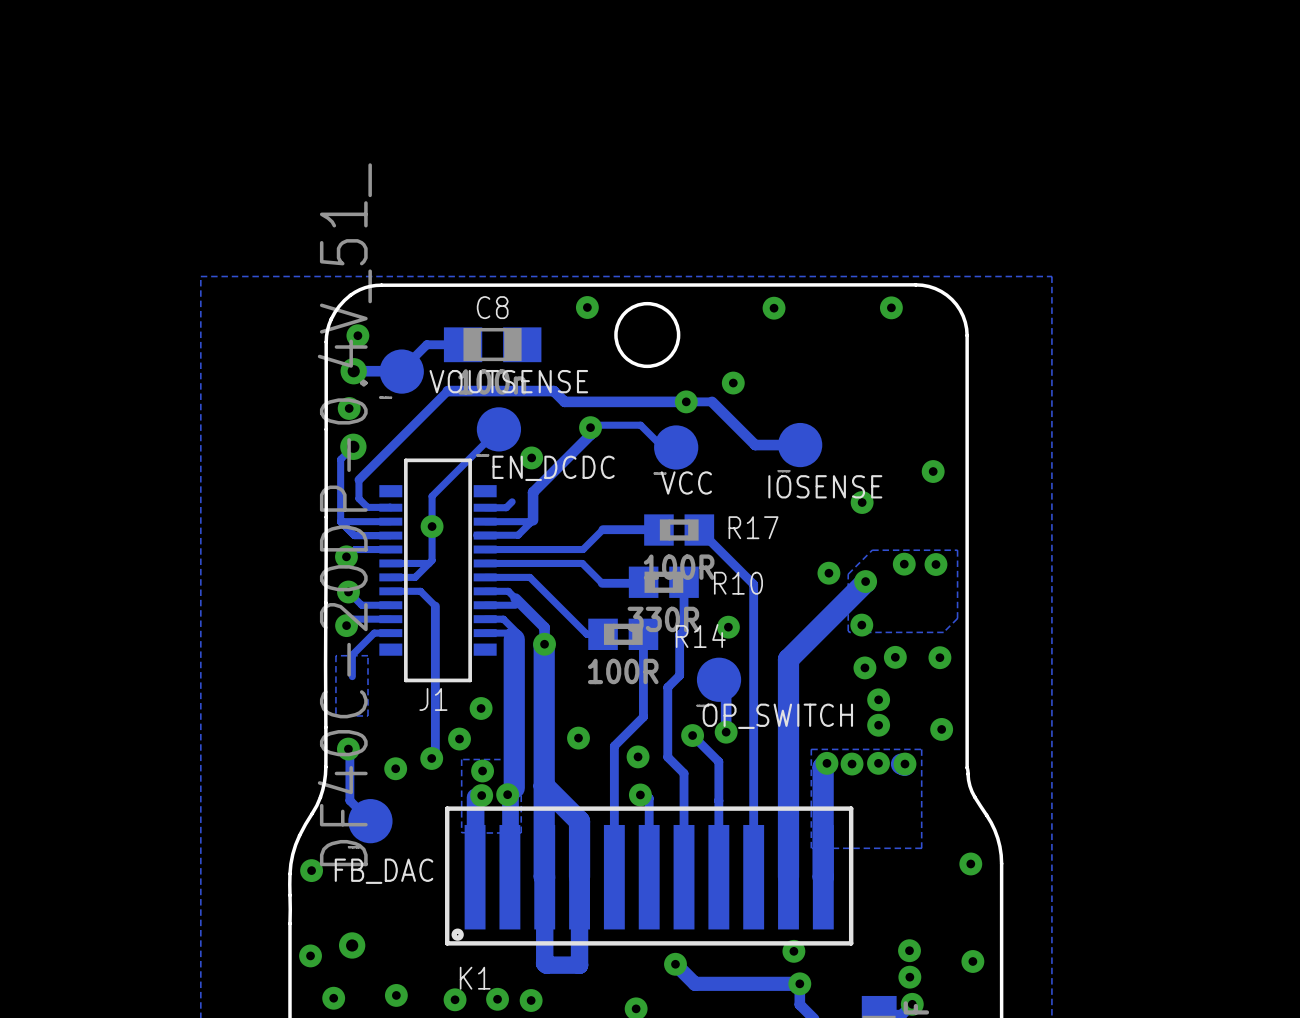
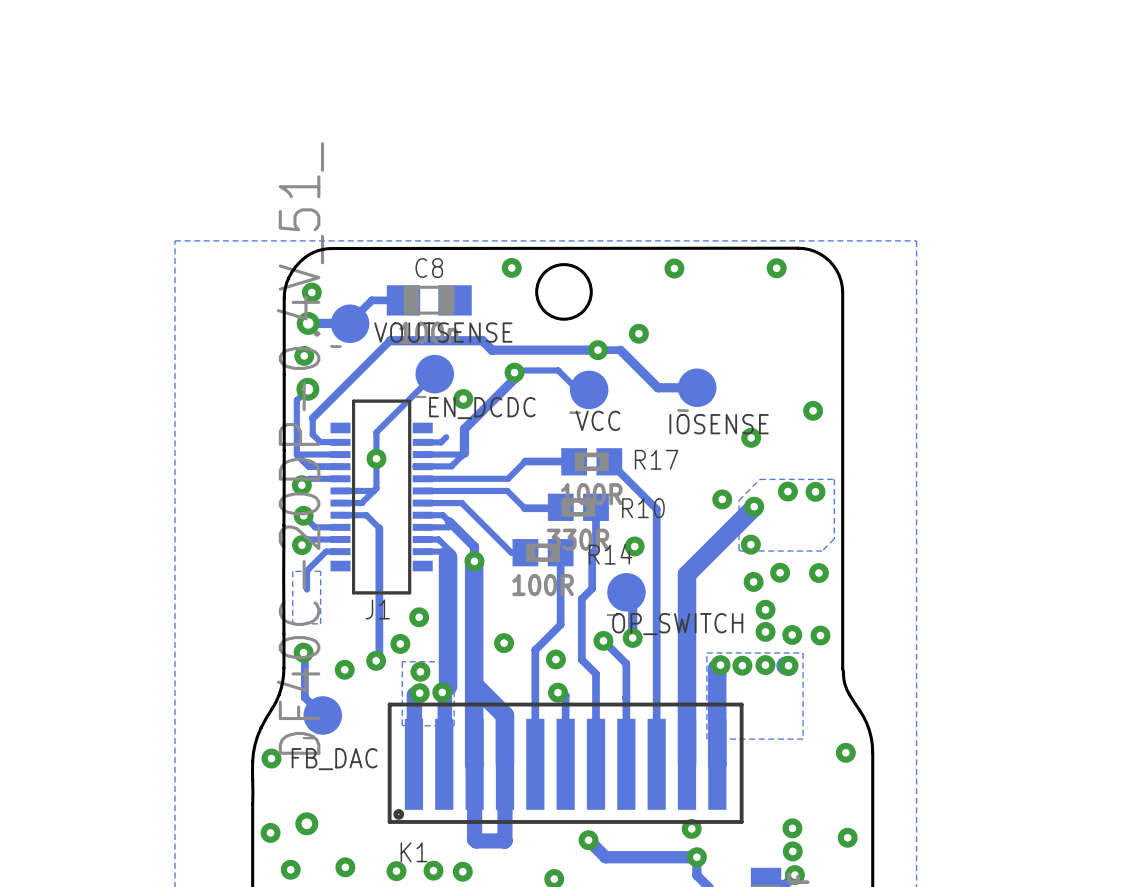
via: none -> (792, 634)

